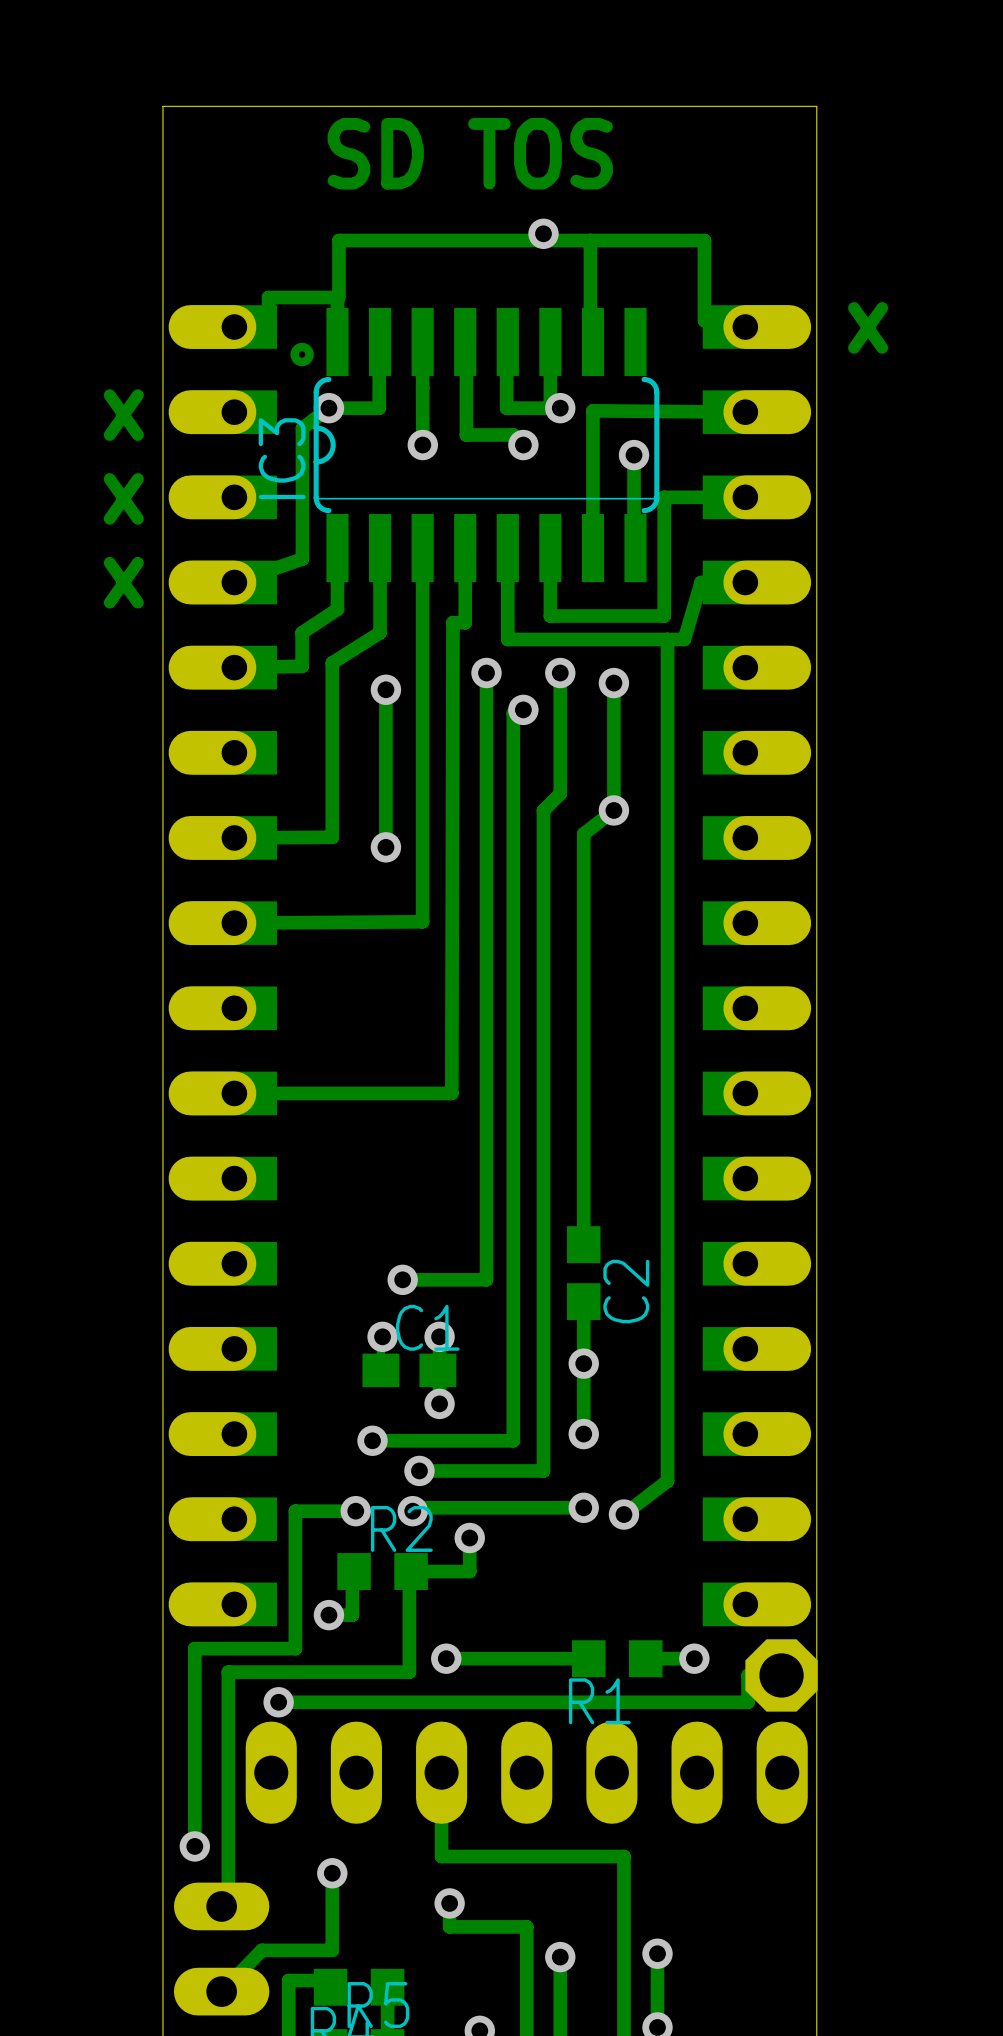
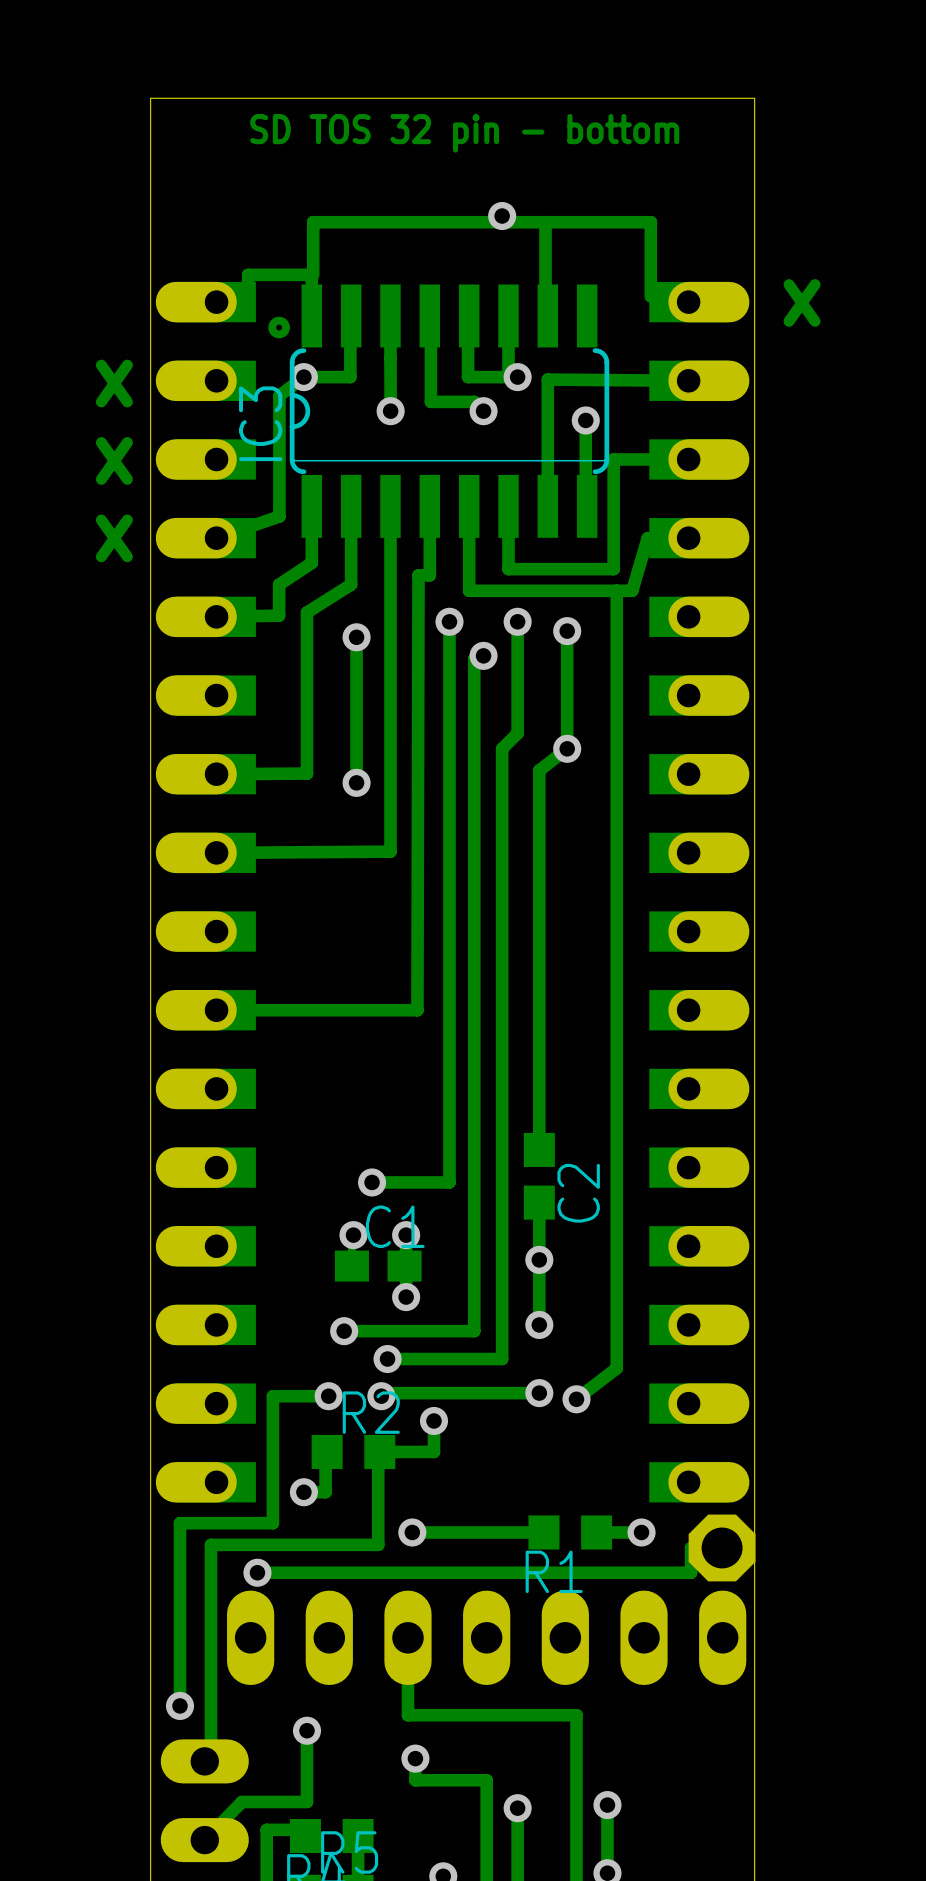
text: none -> SD TOS 32 pin - bottom (464, 133)
text: SD TOS (470, 153) -> none

